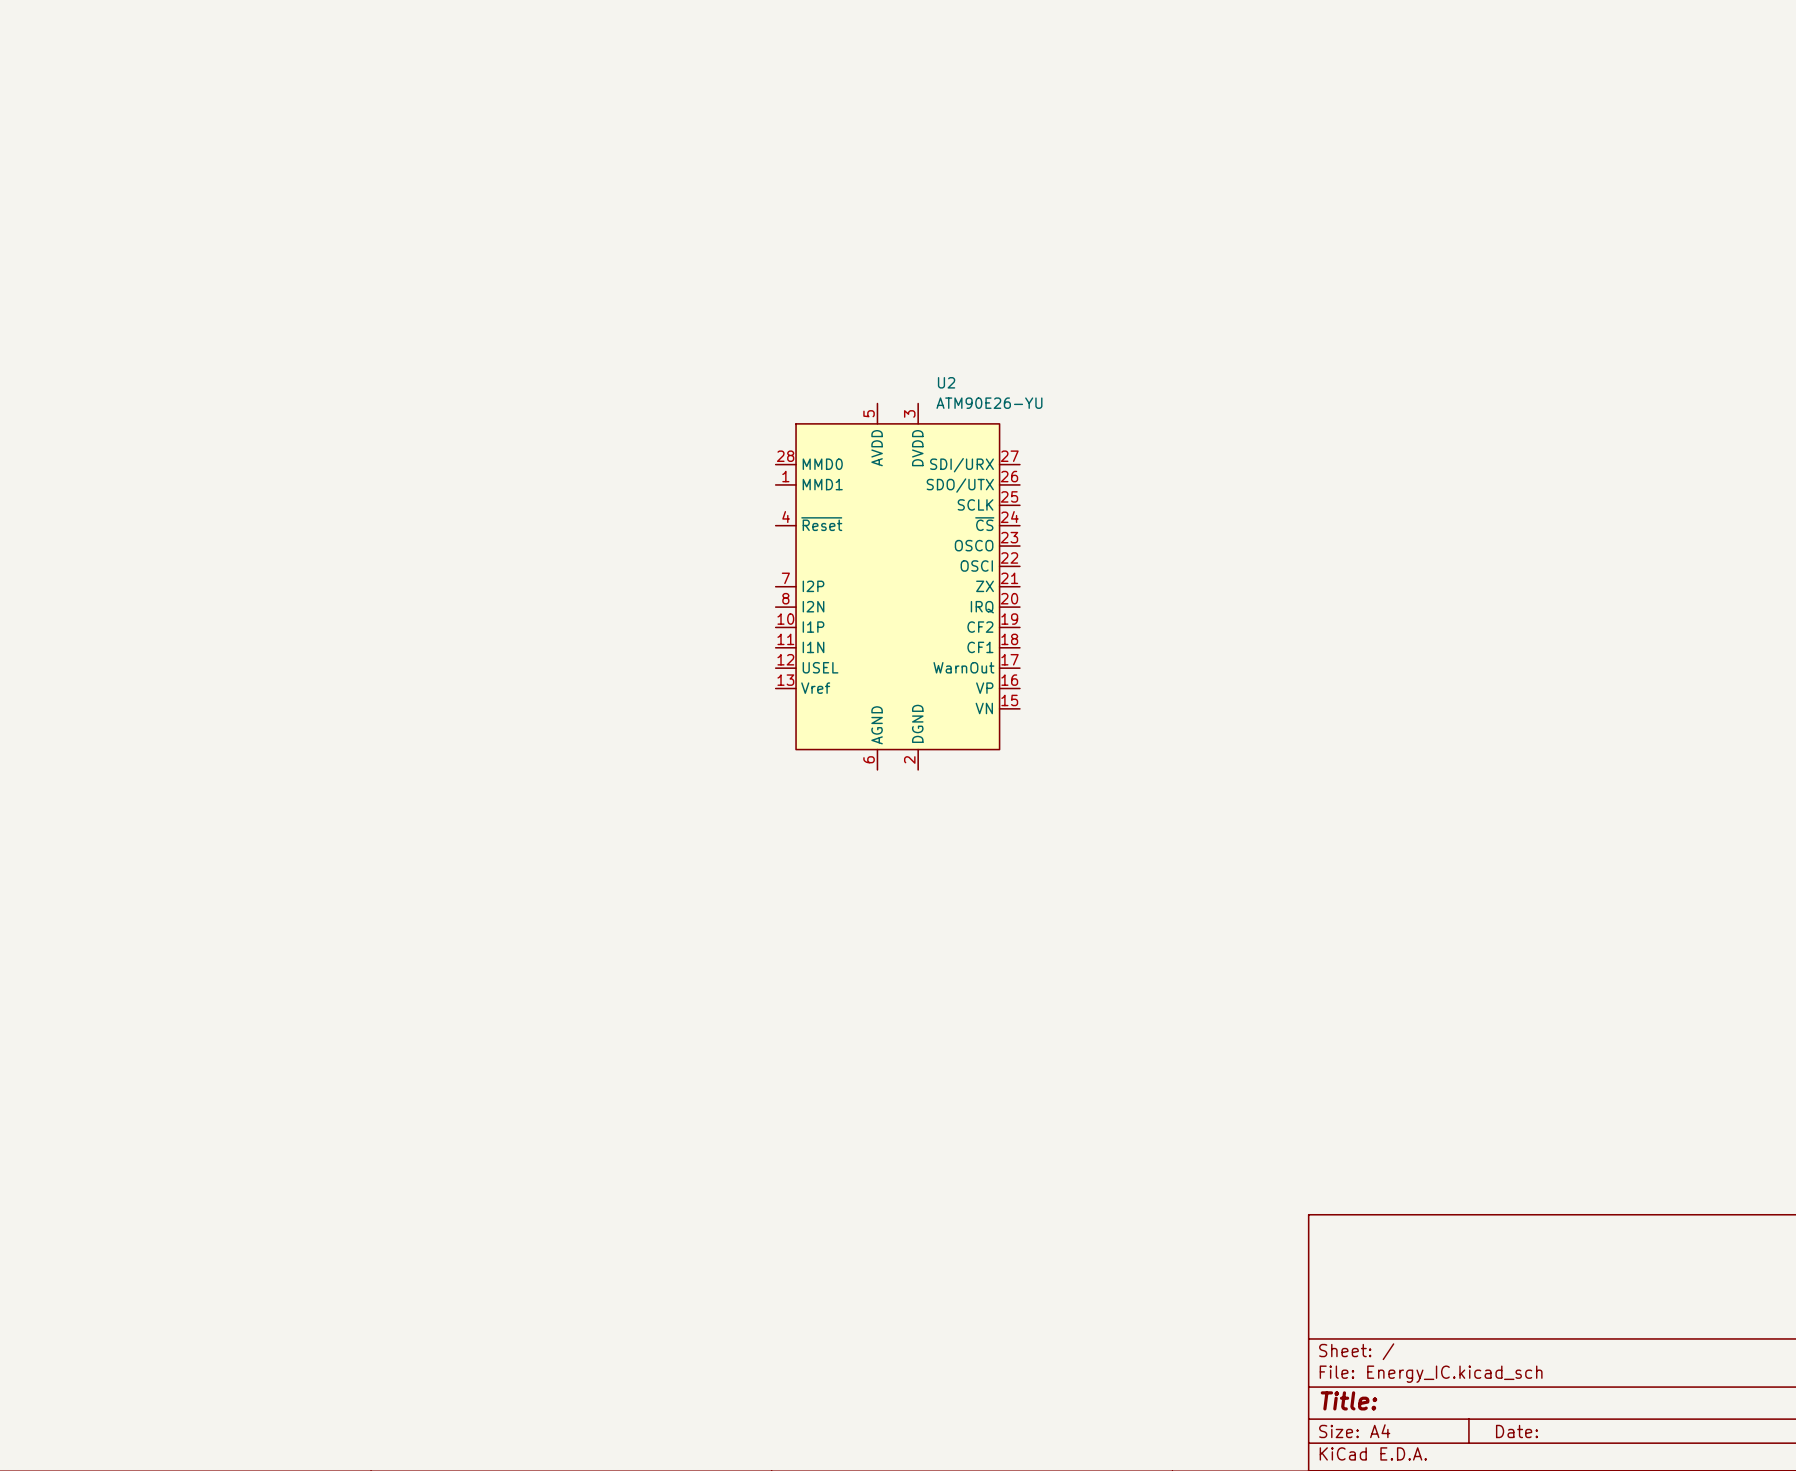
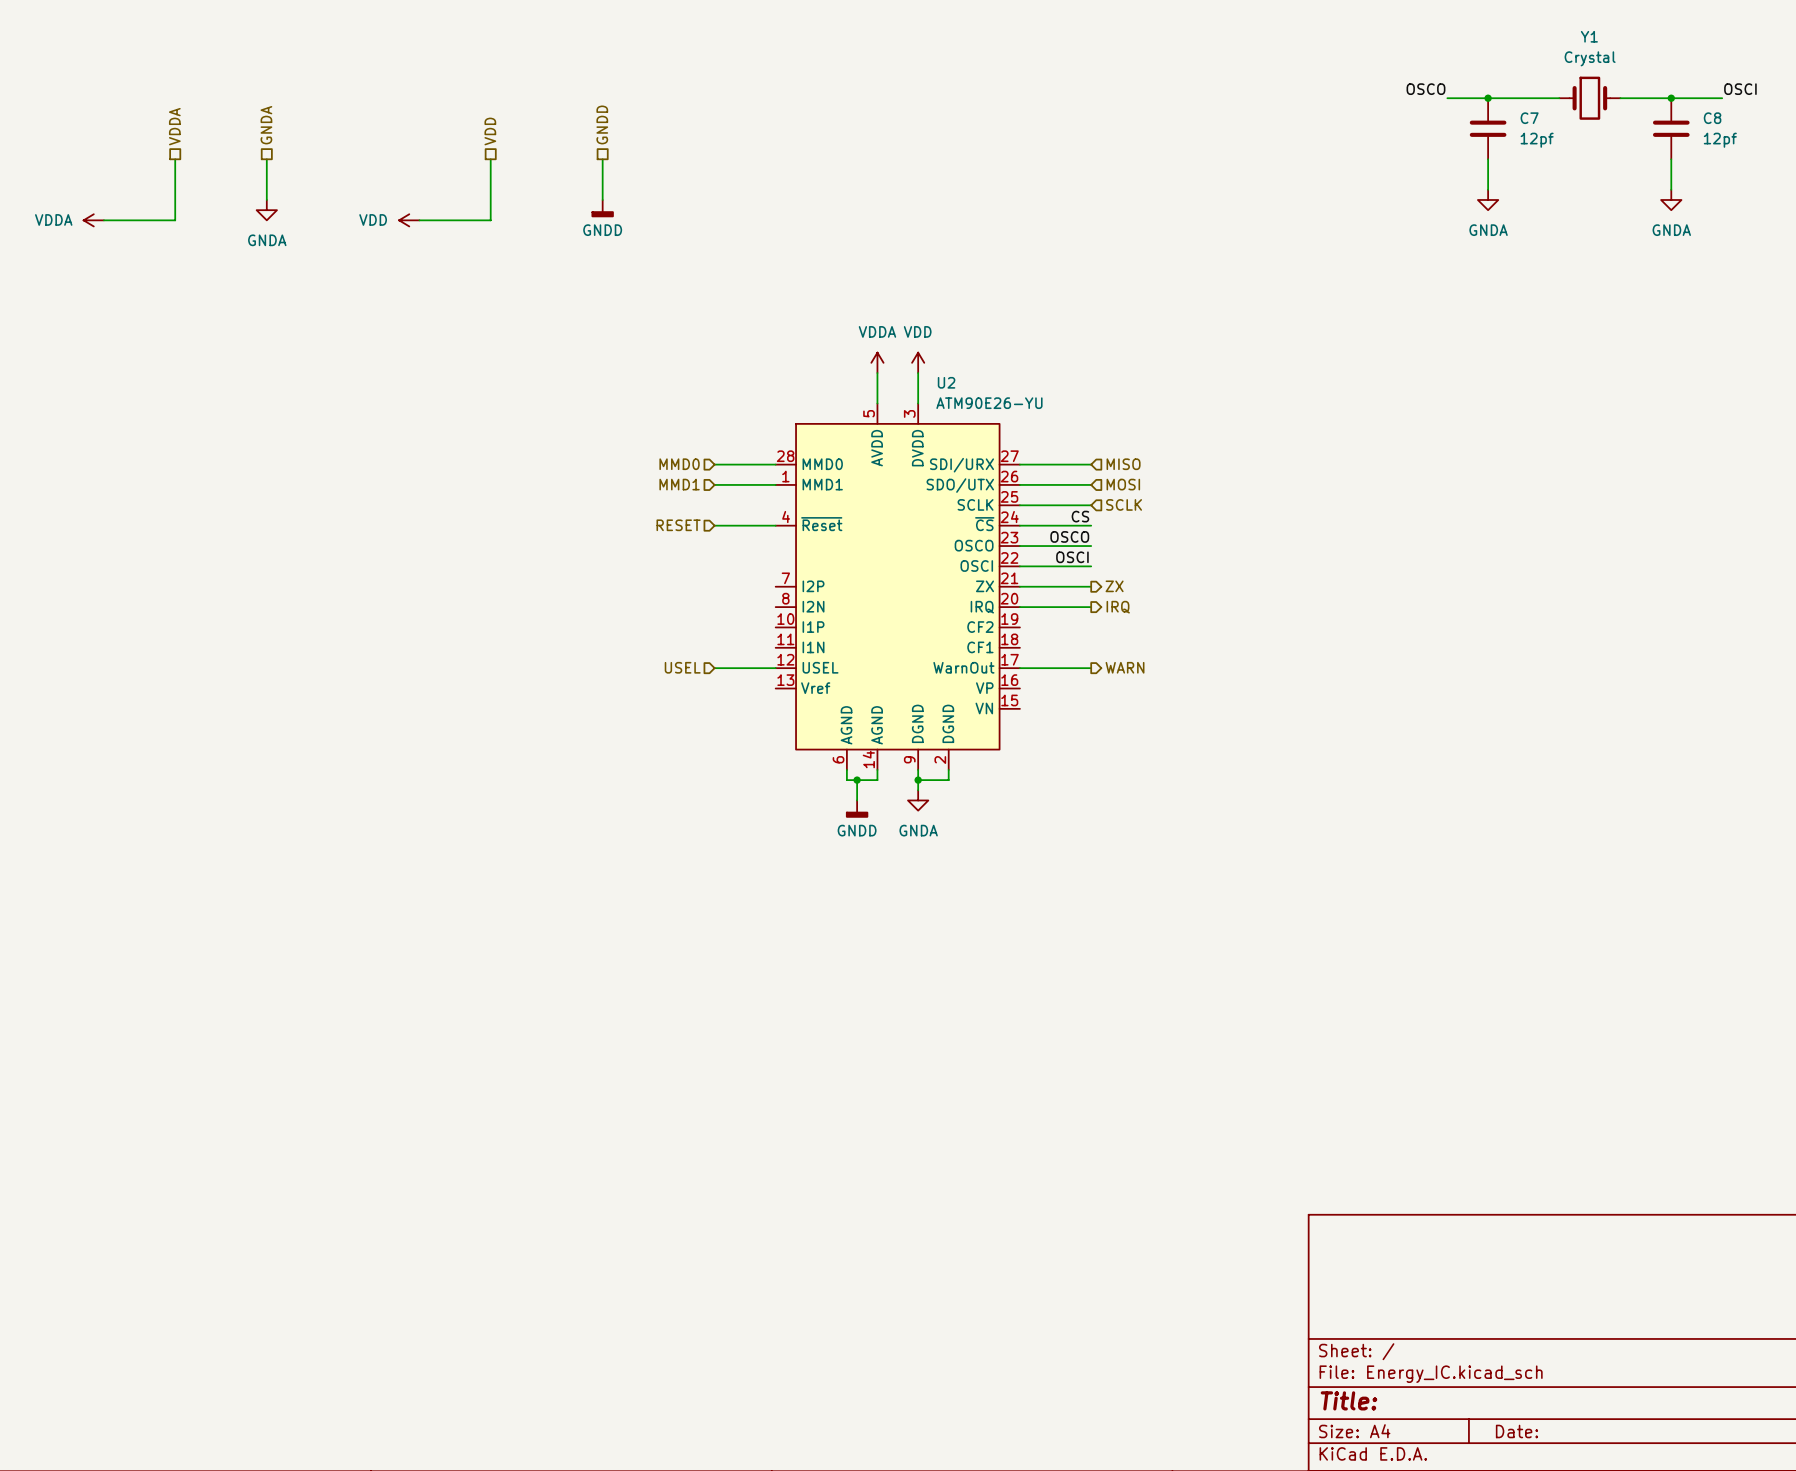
label: none -> OSCO (1425, 89)
label: none -> OSCI (1740, 89)
wire: none -> (1447, 98) (1559, 98)
junction: none -> (1488, 98)
Y1: none -> Crystal (1589, 98)
wire: none -> (1620, 98) (1722, 98)
junction: none -> (1671, 98)
hierarchical label: none -> GNDD (602, 124)
hierarchical label: none -> GNDA (266, 125)
hierarchical label: none -> VDDA (174, 126)
C7: none -> 12pf (1488, 128)
C8: none -> 12pf (1671, 128)
hierarchical label: none -> VDD (490, 131)
wire: none -> (175, 159) (175, 220) (103, 220)
wire: none -> (266, 159) (266, 199)
wire: none -> (490, 159) (490, 220) (419, 220)
wire: none -> (602, 159) (602, 199)
wire: none -> (1488, 159) (1488, 189)
wire: none -> (1671, 159) (1671, 189)
power symbol: none -> GNDA (1488, 199)
power symbol: none -> GNDA (1671, 199)
power symbol: none -> GNDD (602, 208)
power symbol: none -> GNDA (266, 210)
power symbol: none -> VDDA (93, 220)
power symbol: none -> VDD (409, 220)
power symbol: none -> VDDA (877, 362)
power symbol: none -> VDD (918, 362)
wire: none -> (877, 373) (877, 403)
wire: none -> (918, 373) (918, 403)
U2 symbol: [775, 403, 1020, 770] -> [775, 403, 1020, 770]
hierarchical label: none -> MMD0 (679, 464)
wire: none -> (714, 464) (775, 464)
wire: none -> (1019, 464) (1091, 464)
hierarchical label: none -> MISO (1123, 464)
hierarchical label: none -> MMD1 (679, 484)
wire: none -> (714, 484) (775, 484)
wire: none -> (1019, 484) (1091, 484)
hierarchical label: none -> MOSI (1123, 484)
hierarchical label: none -> SCLK (1124, 504)
wire: none -> (1019, 505) (1091, 505)
label: none -> CS (1080, 516)
hierarchical label: none -> RESET (678, 525)
wire: none -> (714, 525) (775, 525)
wire: none -> (1019, 525) (1091, 525)
label: none -> OSCO (1069, 536)
wire: none -> (1019, 546) (1091, 546)
label: none -> OSCI (1072, 557)
wire: none -> (1019, 566) (1091, 566)
wire: none -> (1019, 586) (1091, 586)
hierarchical label: none -> ZX (1114, 586)
wire: none -> (1019, 607) (1091, 607)
hierarchical label: none -> IRQ (1118, 607)
hierarchical label: none -> USEL (682, 667)
hierarchical label: none -> WARN (1125, 667)
wire: none -> (714, 668) (775, 668)
wire: none -> (1019, 668) (1091, 668)
wire: none -> (846, 769) (846, 780) (877, 780) (877, 769)
wire: none -> (918, 769) (918, 790)
wire: none -> (948, 769) (948, 780) (918, 780)
wire: none -> (857, 780) (857, 800)
junction: none -> (857, 780)
junction: none -> (918, 780)
power symbol: none -> GNDA (918, 800)
power symbol: none -> GNDD (857, 809)

